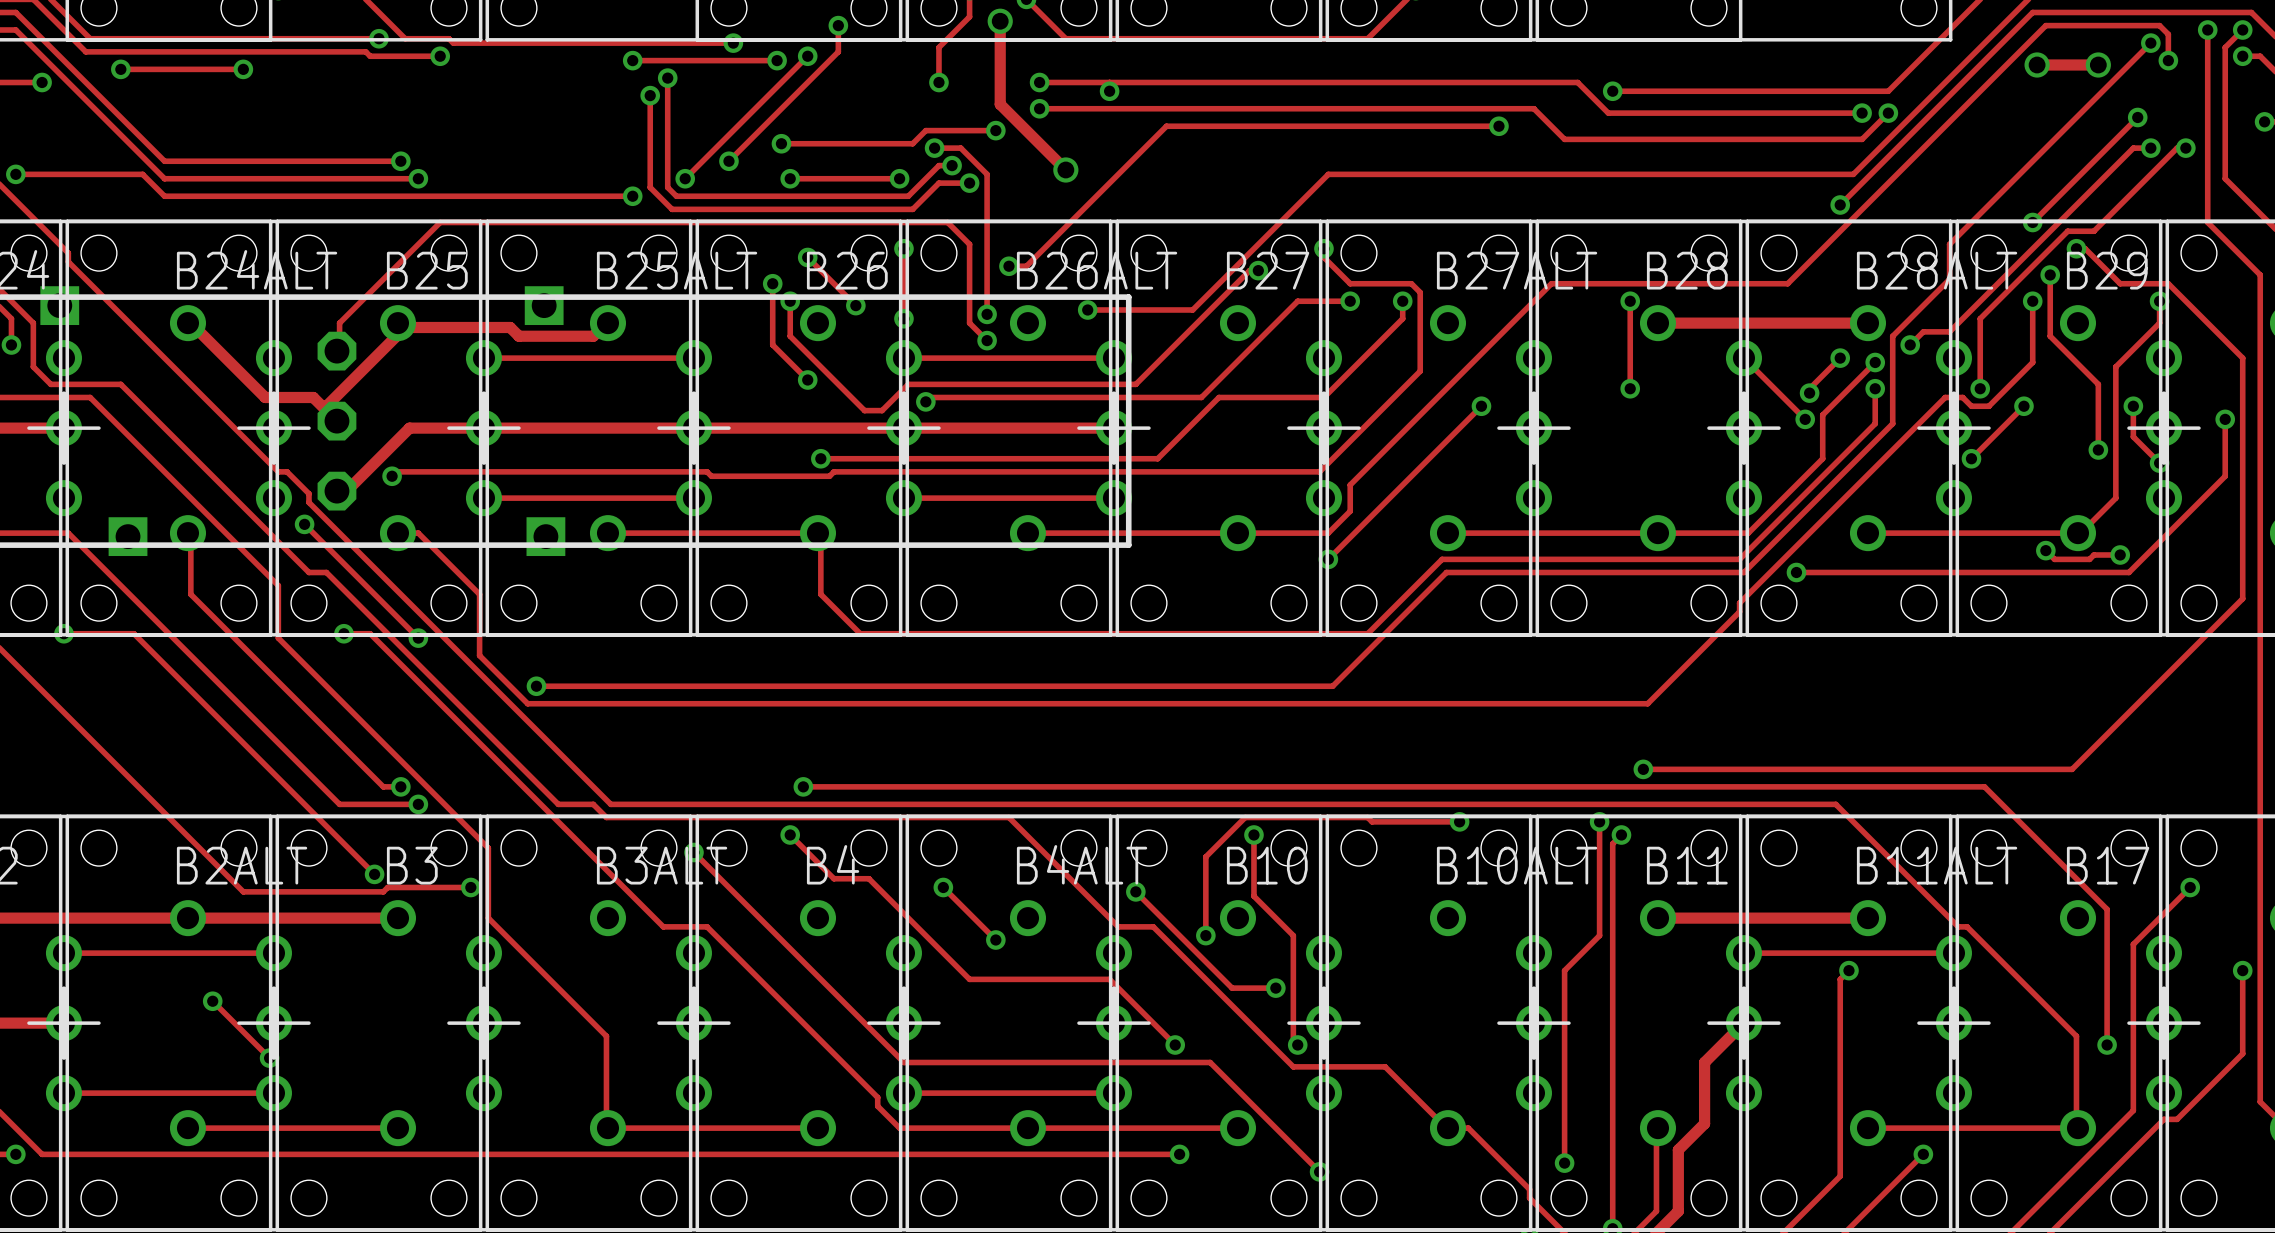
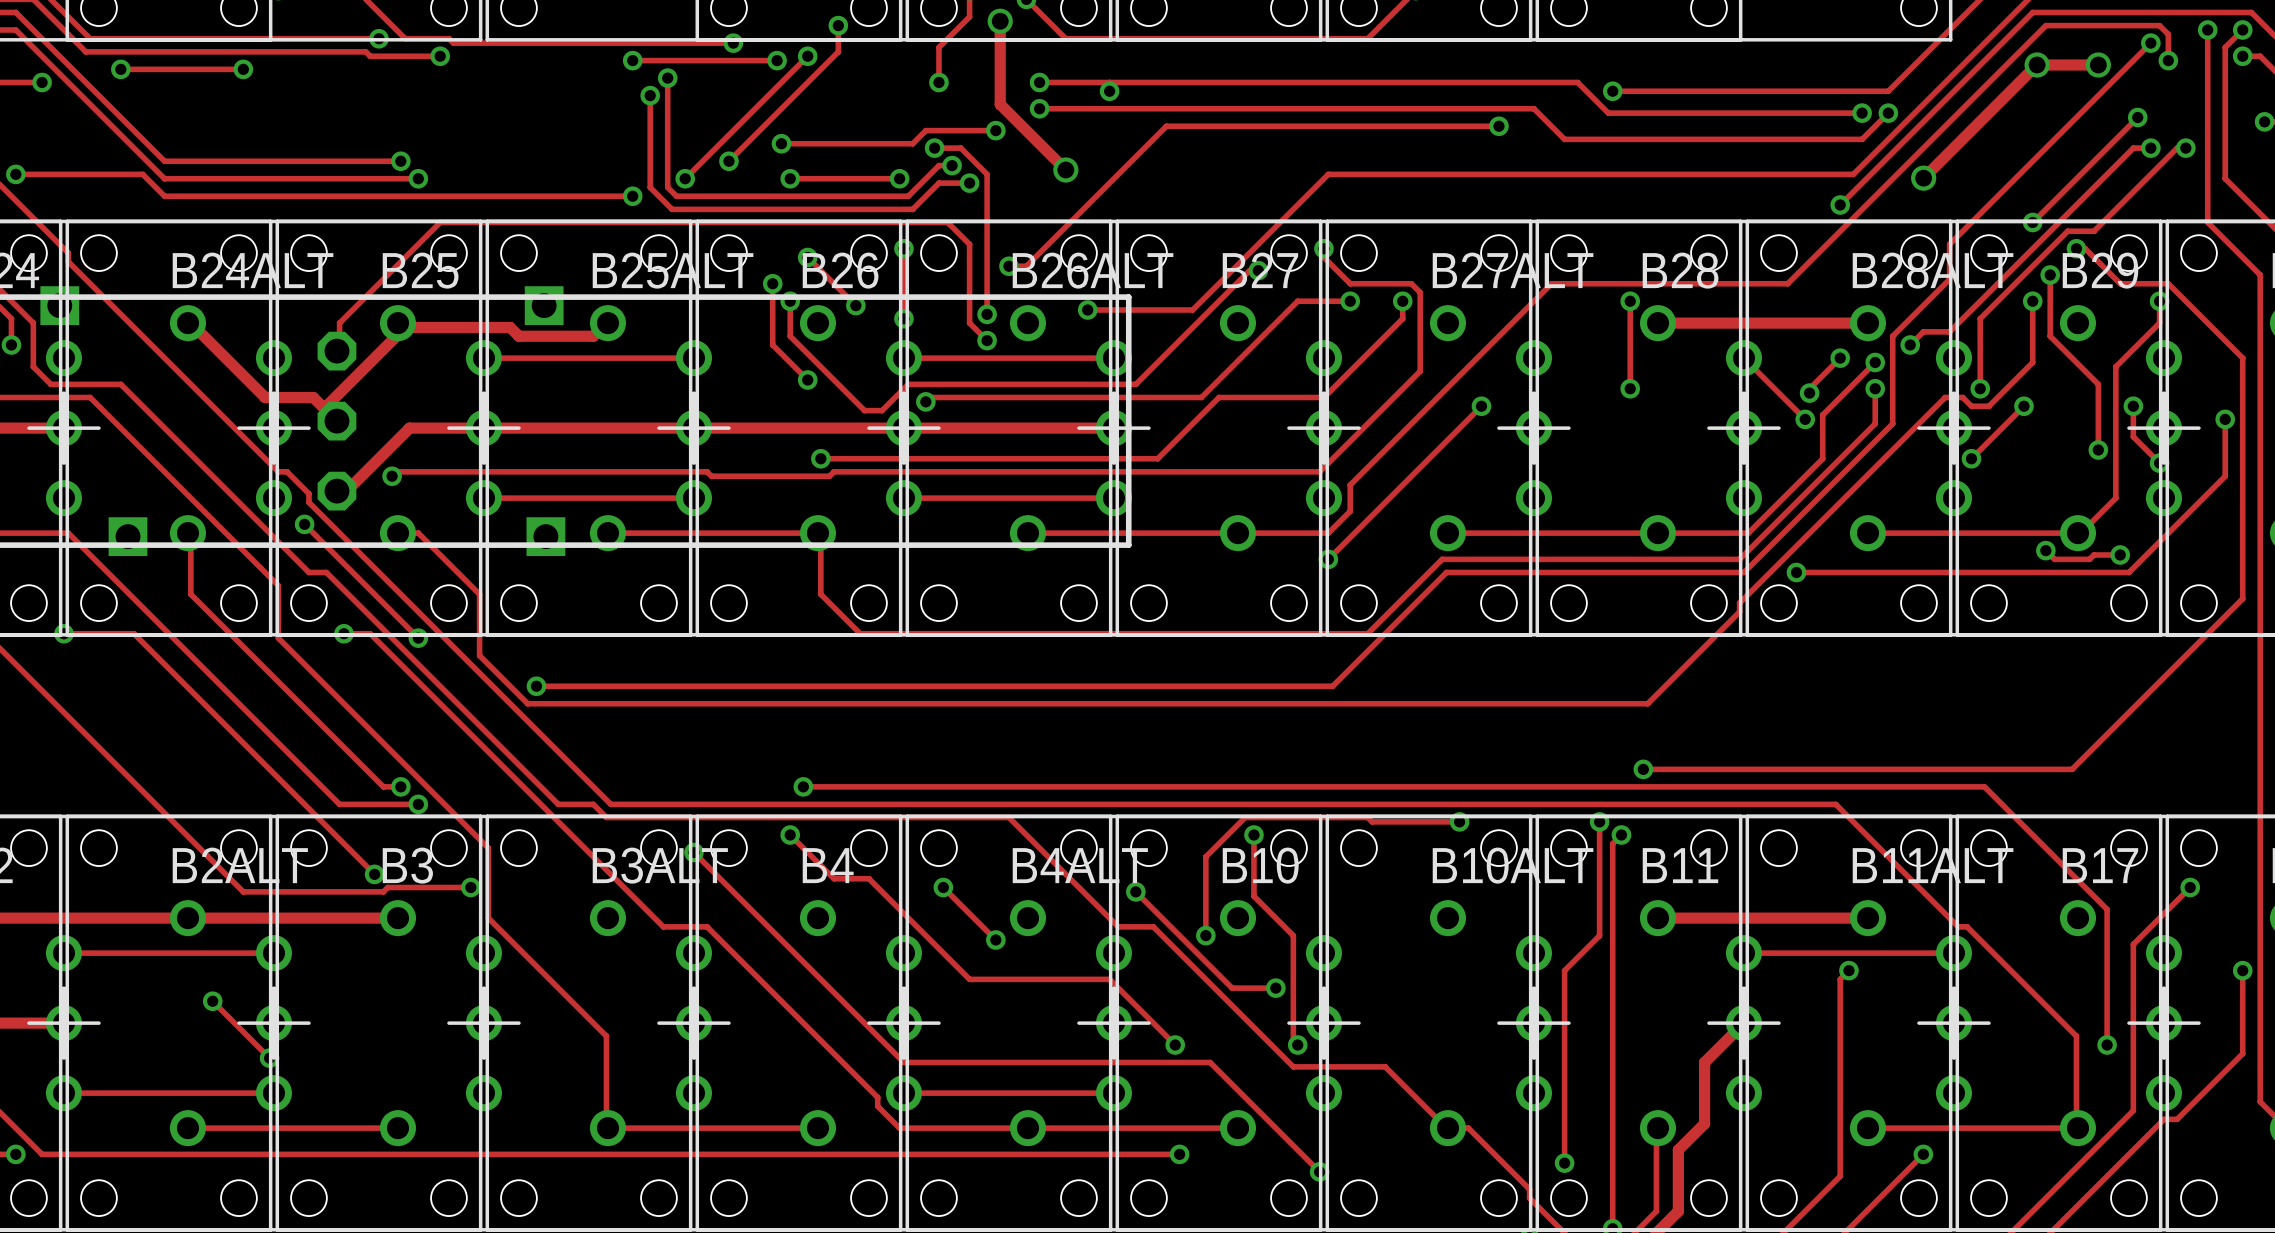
track: none -> (2037, 64) (1923, 178)
via: none -> (1923, 178)

